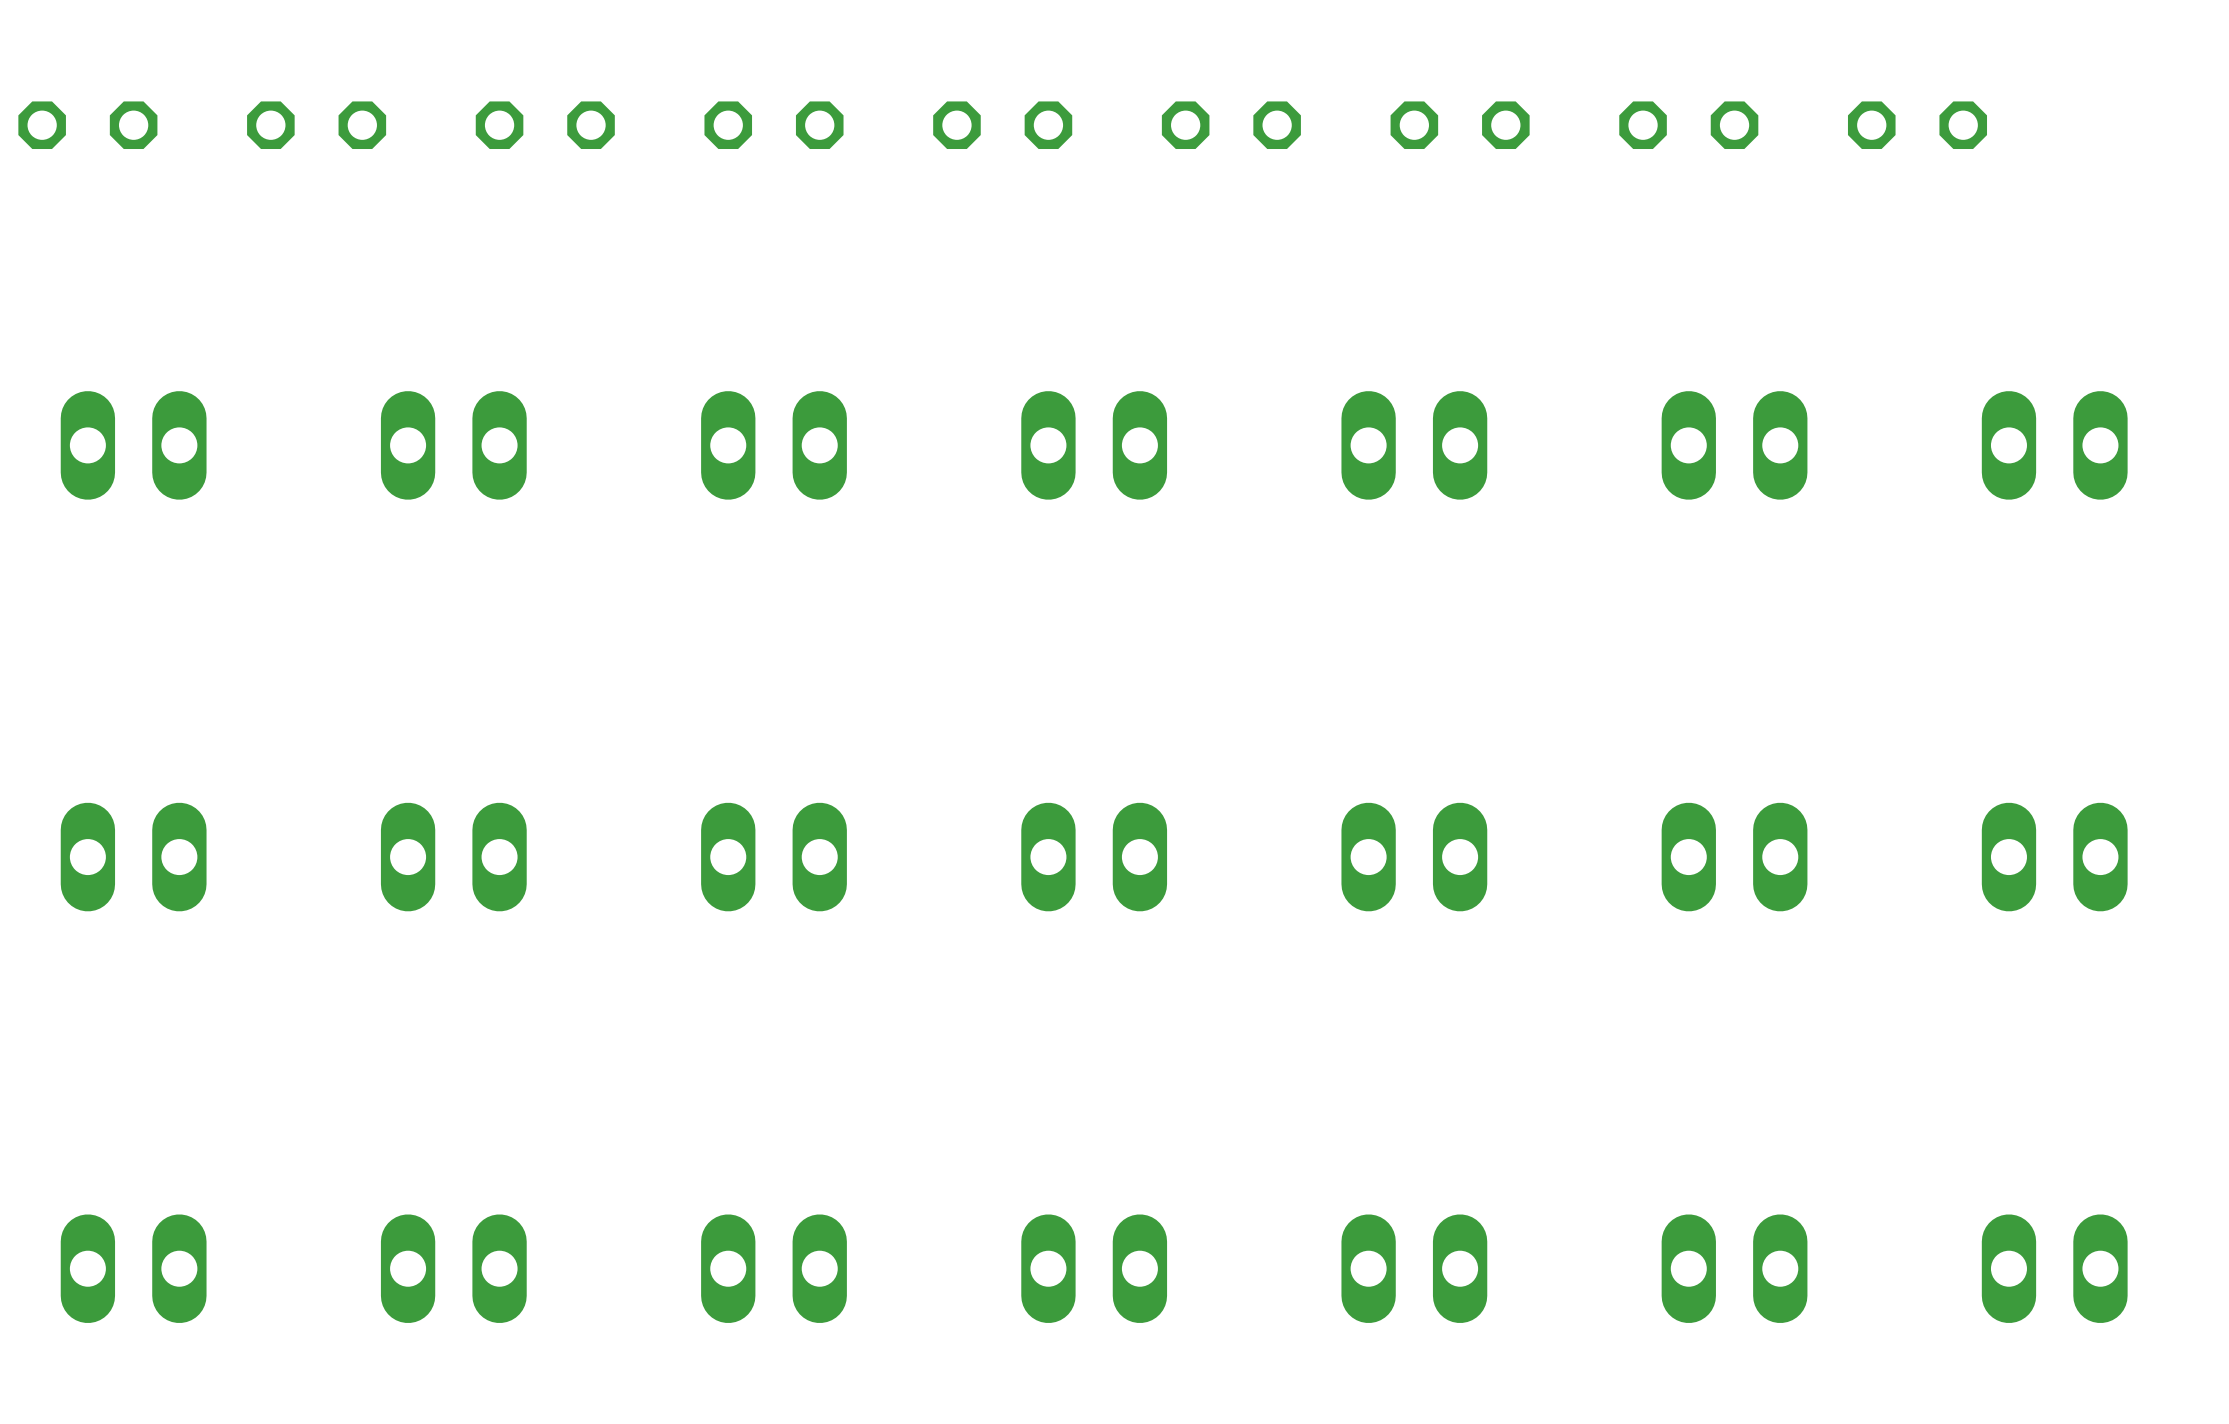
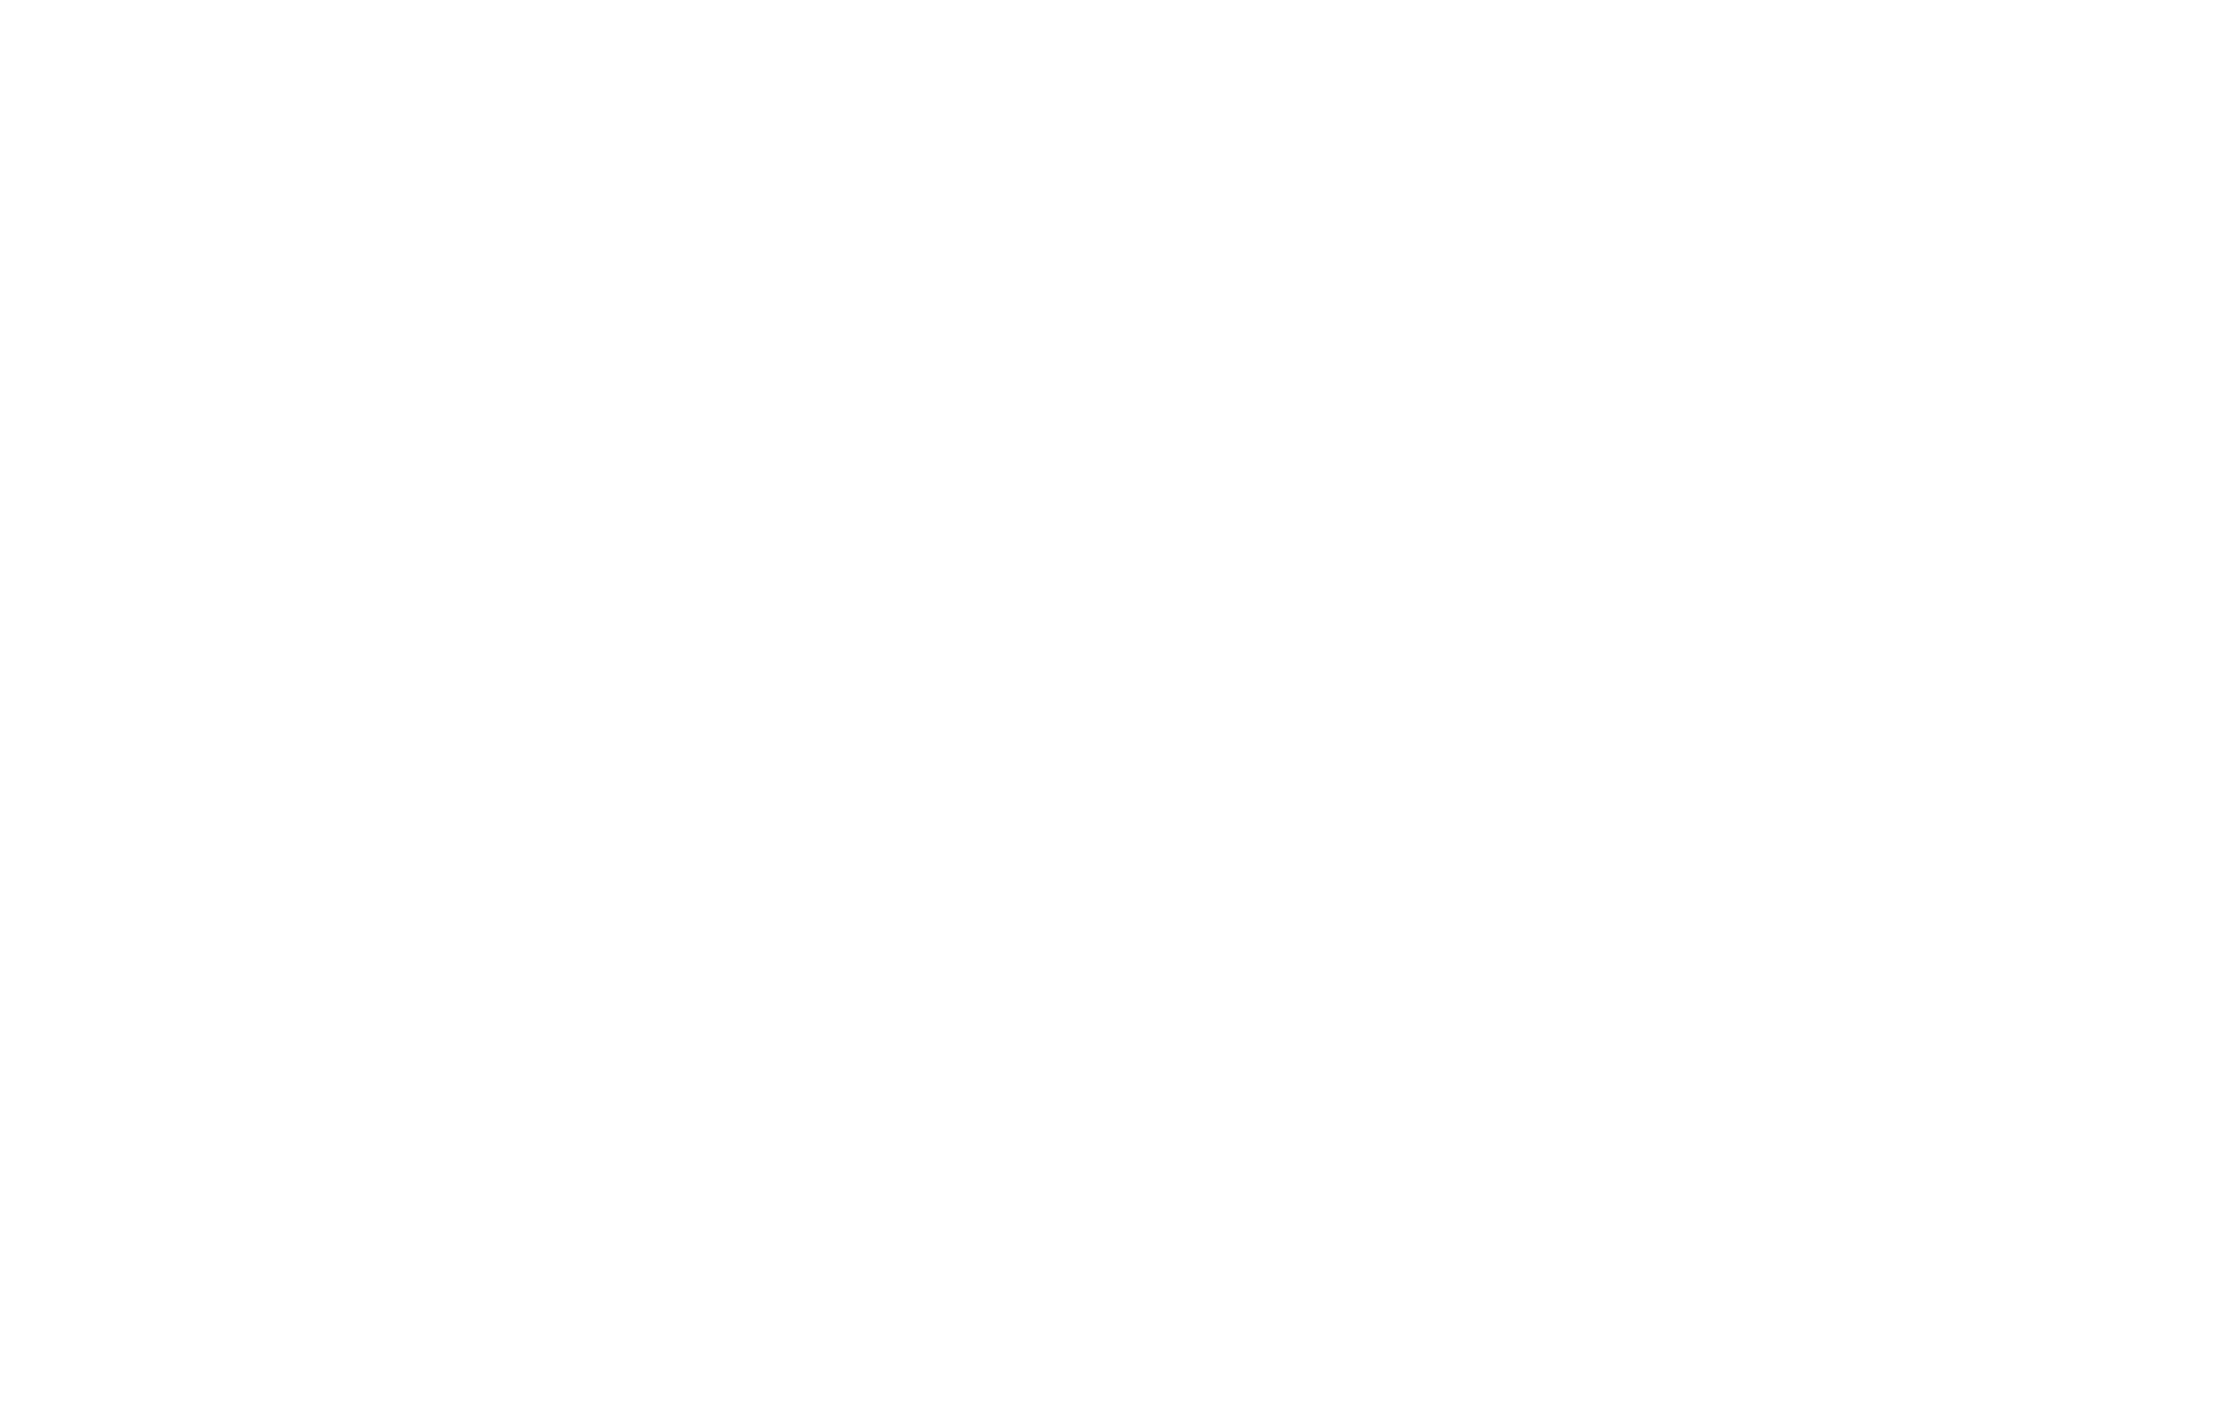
part: (87, 125) -> none
part: (316, 125) -> none
part: (545, 125) -> none
part: (773, 125) -> none
part: (1002, 125) -> none
part: (1231, 125) -> none
part: (1460, 125) -> none
part: (1688, 125) -> none
part: (1917, 125) -> none
part: (133, 445) -> none
part: (453, 445) -> none
part: (773, 445) -> none
part: (1094, 445) -> none
part: (1414, 445) -> none
part: (1734, 445) -> none
part: (2054, 445) -> none
part: (133, 857) -> none
part: (453, 857) -> none
part: (773, 857) -> none
part: (1094, 857) -> none
part: (1414, 857) -> none
part: (1734, 857) -> none
part: (2054, 857) -> none
part: (133, 1268) -> none
part: (453, 1268) -> none
part: (773, 1268) -> none
part: (1094, 1268) -> none
part: (1414, 1268) -> none
part: (1734, 1268) -> none
part: (2054, 1268) -> none

